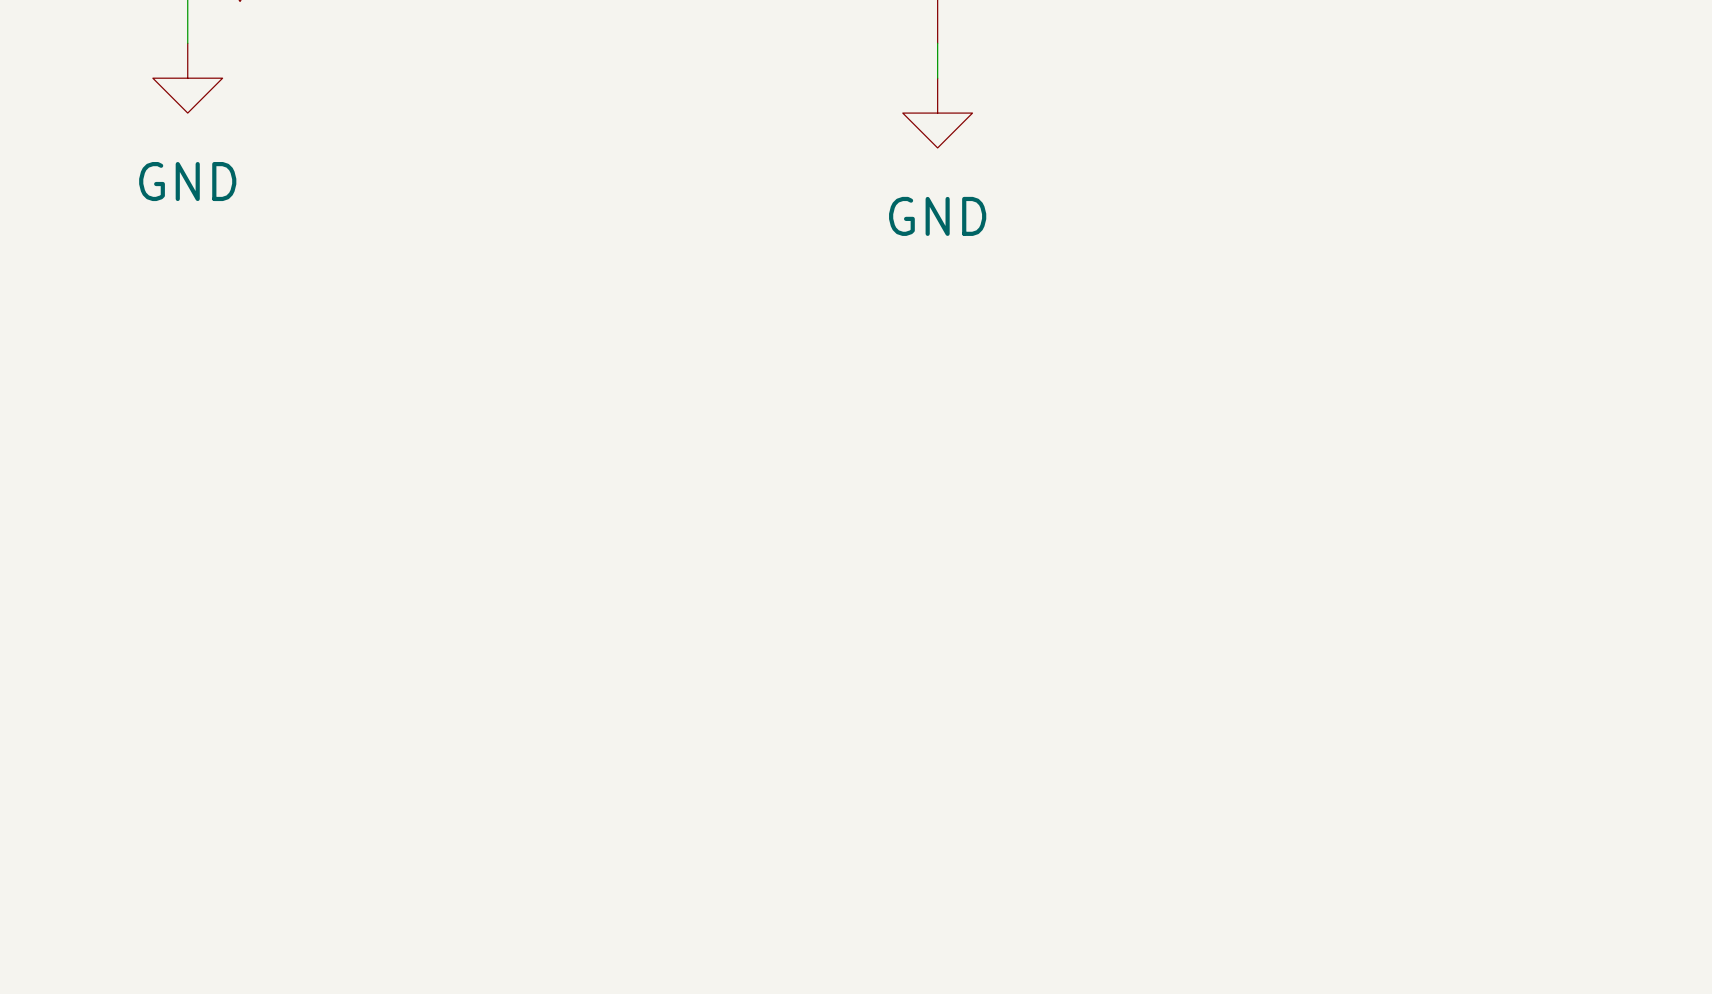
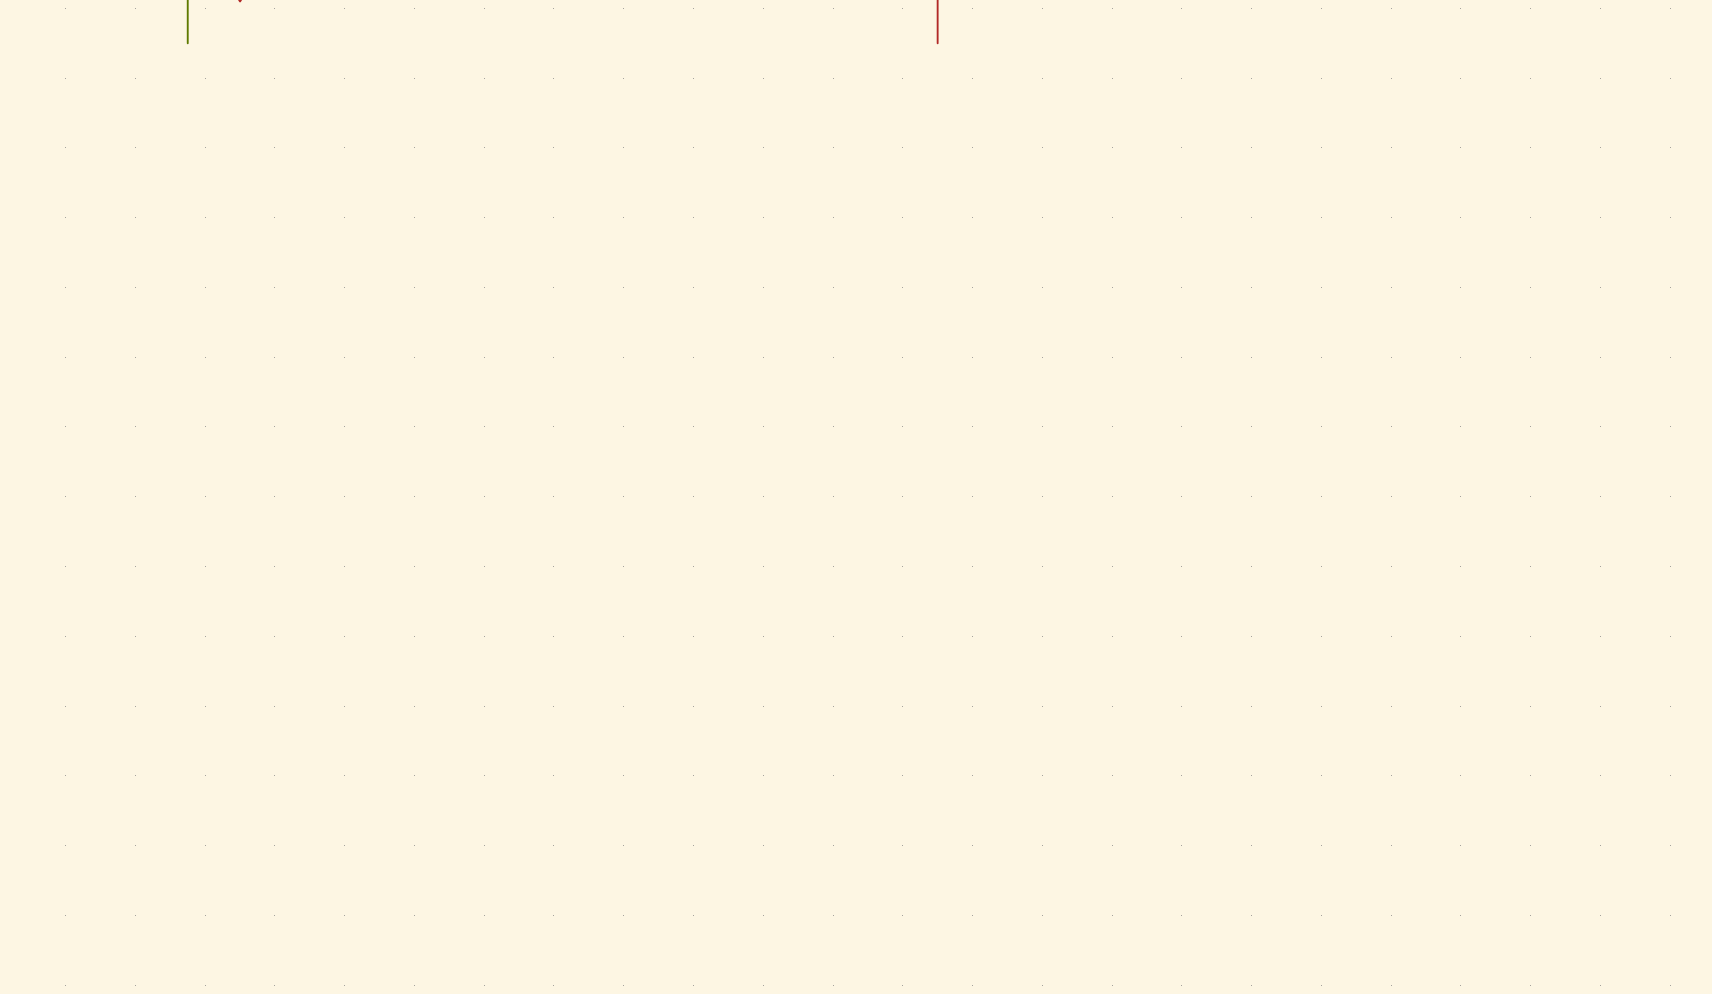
wire: (937, 43) (937, 78) -> none
power symbol: GND (187, 78) -> none
power symbol: GND (937, 113) -> none

